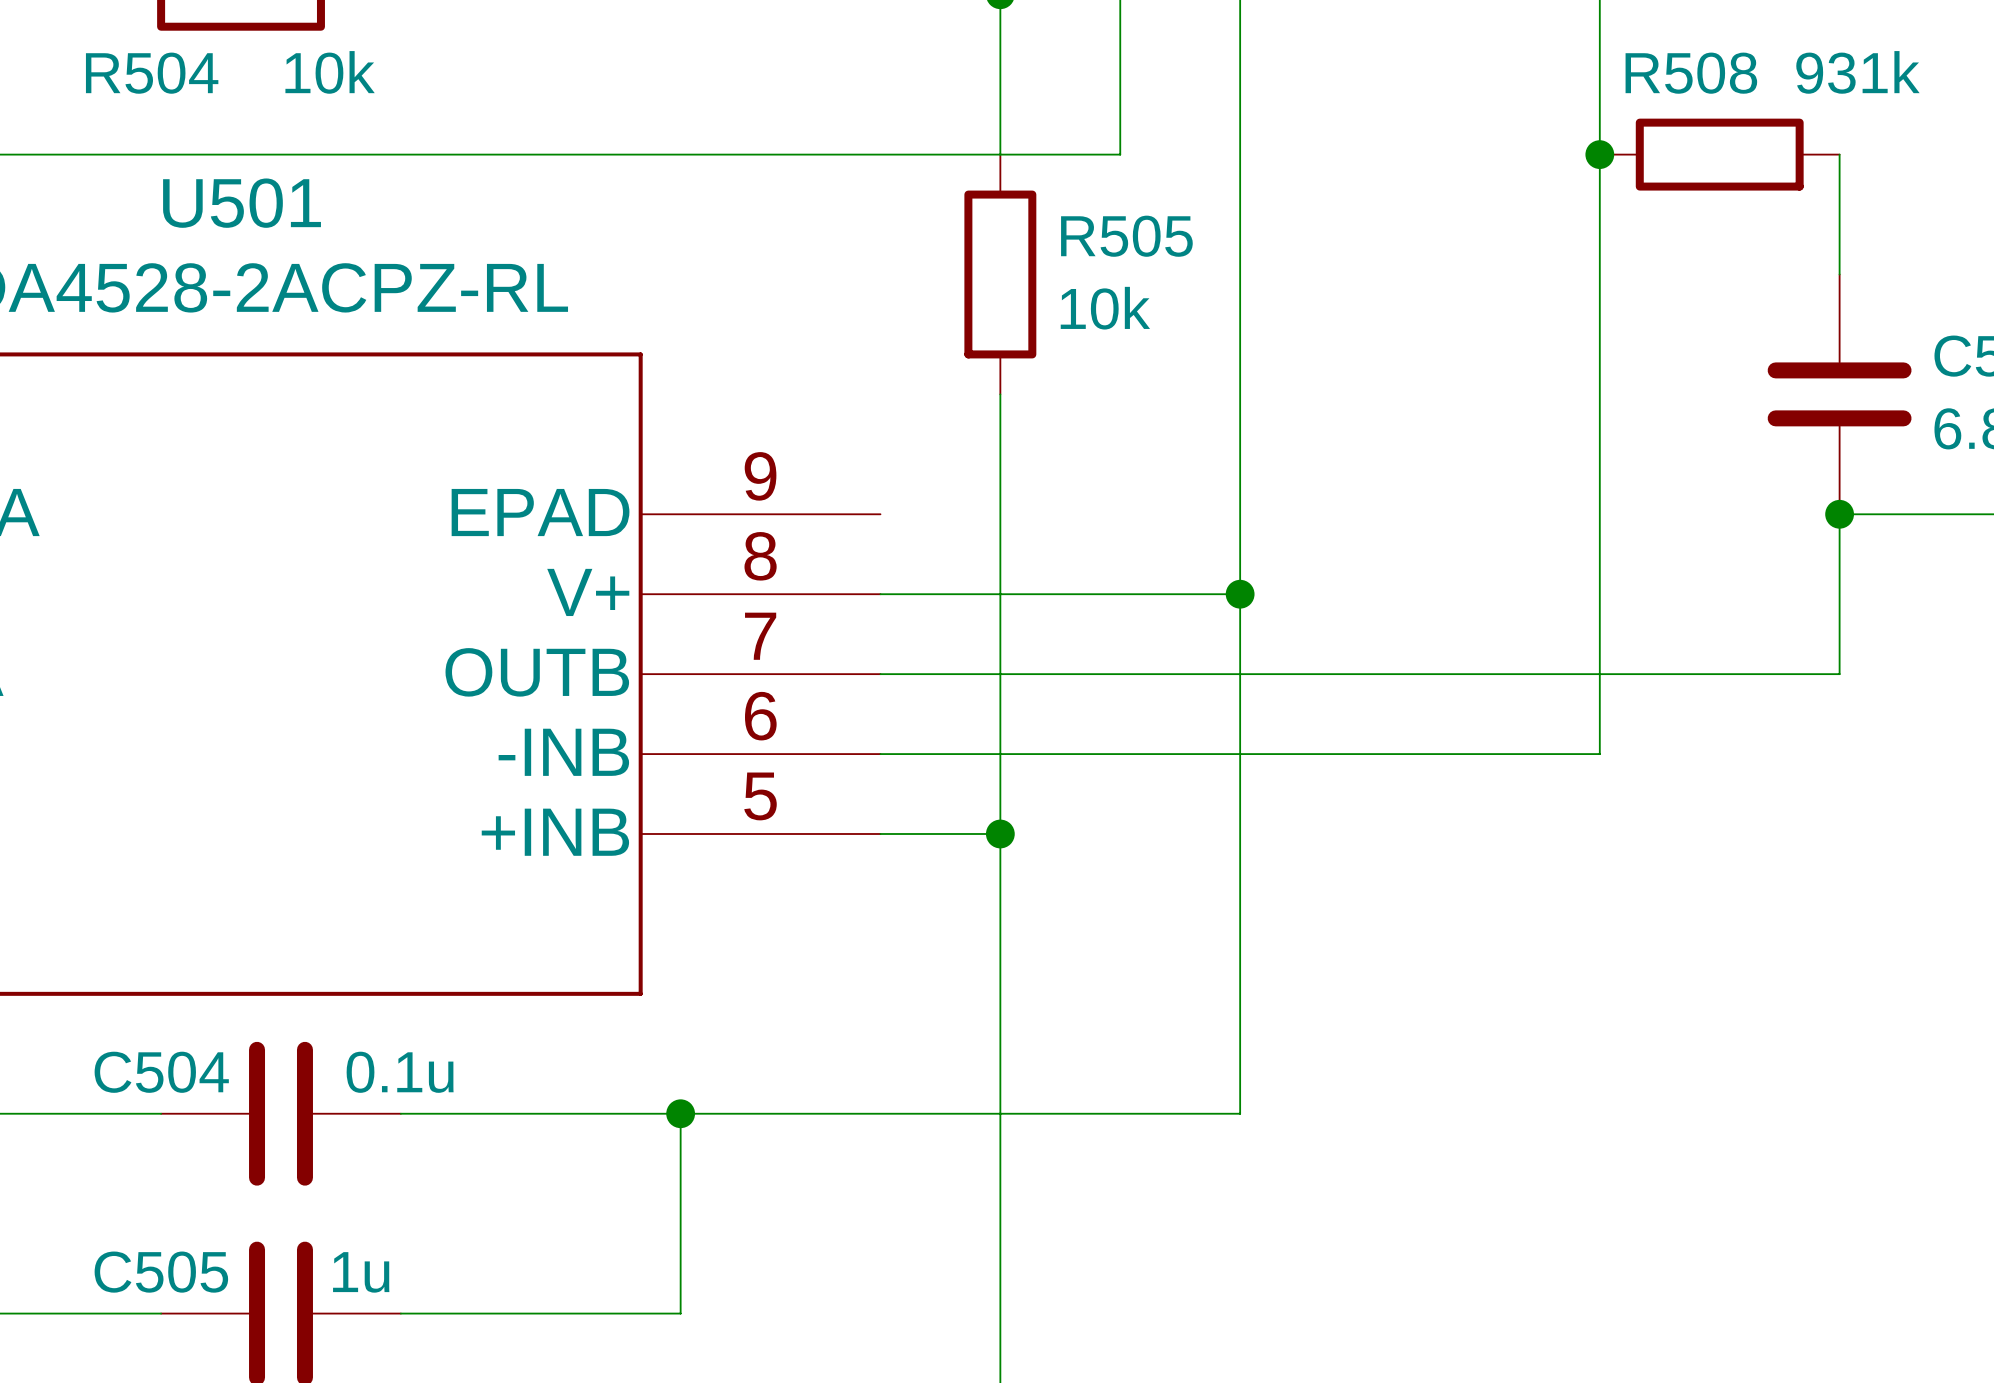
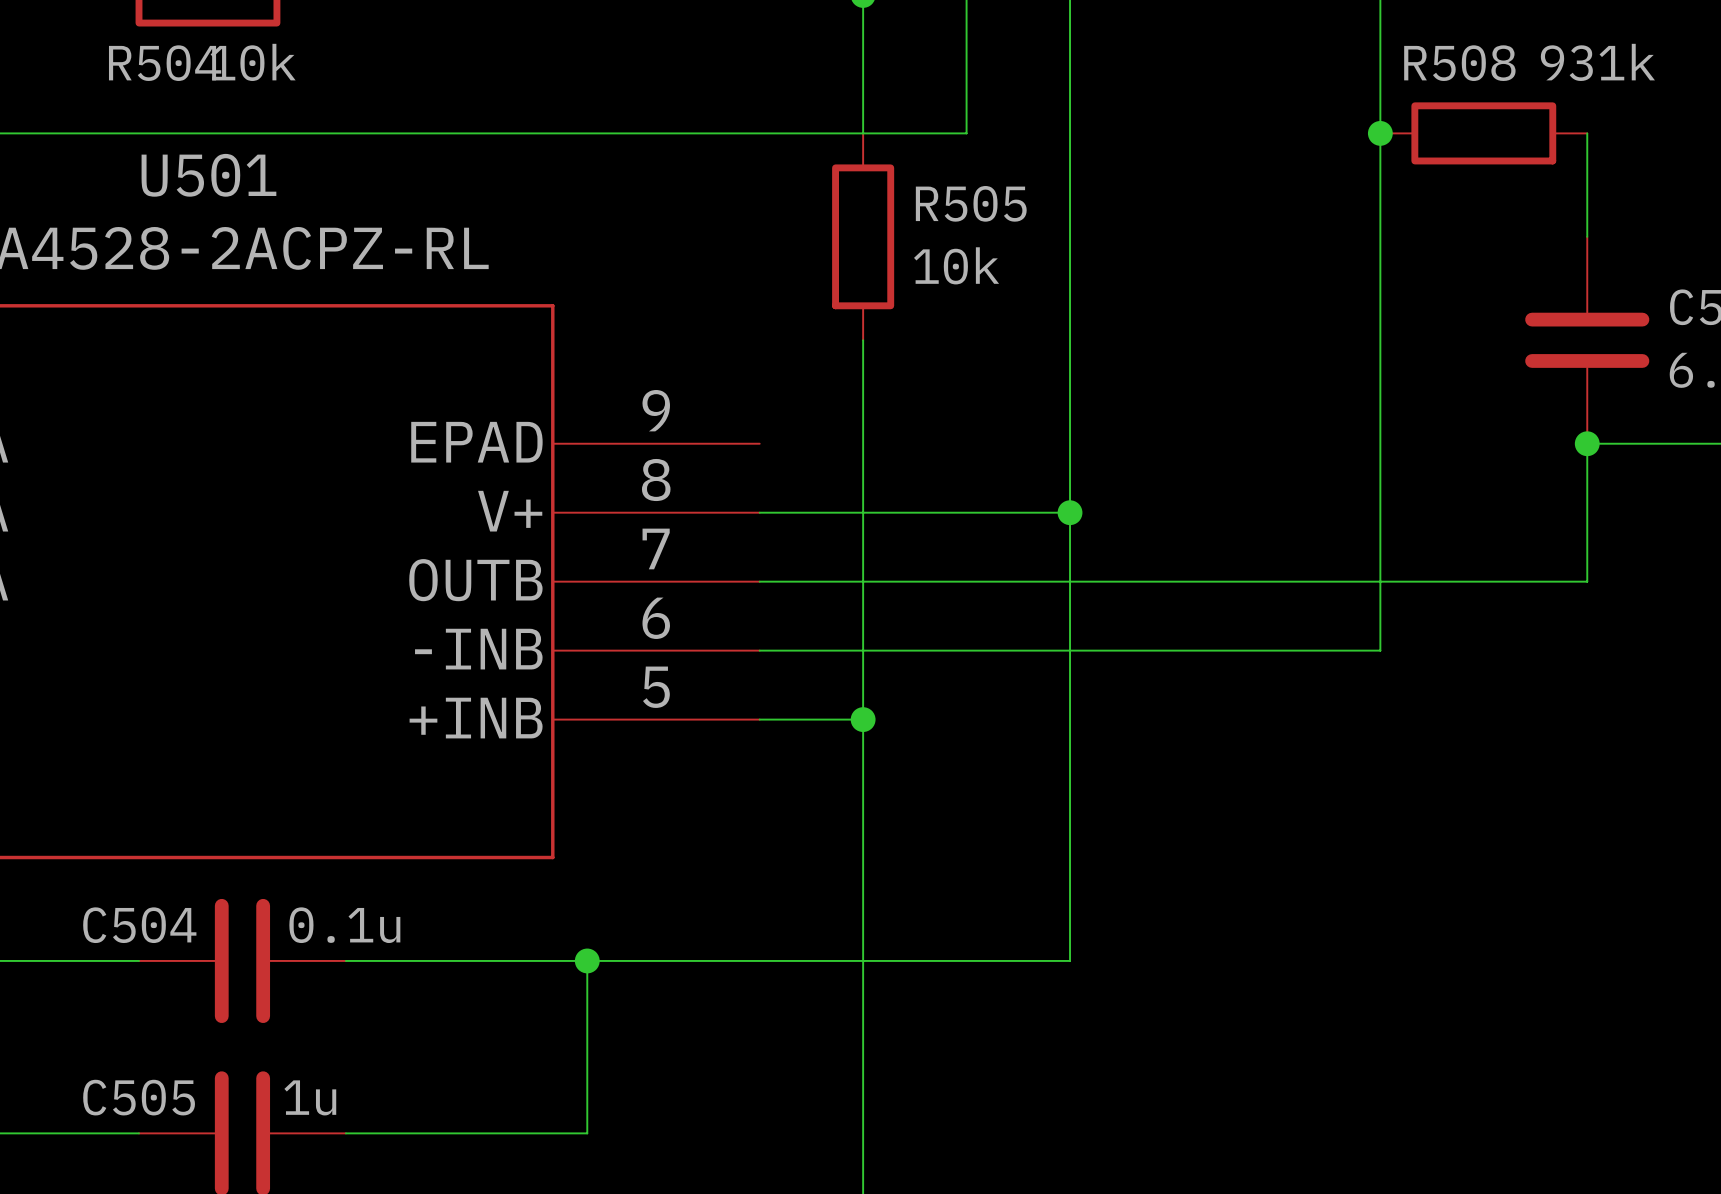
R504 value position: 10k (330, 72) -> 10k (253, 62)
R504 name position: R504 (152, 73) -> R504 (165, 63)

